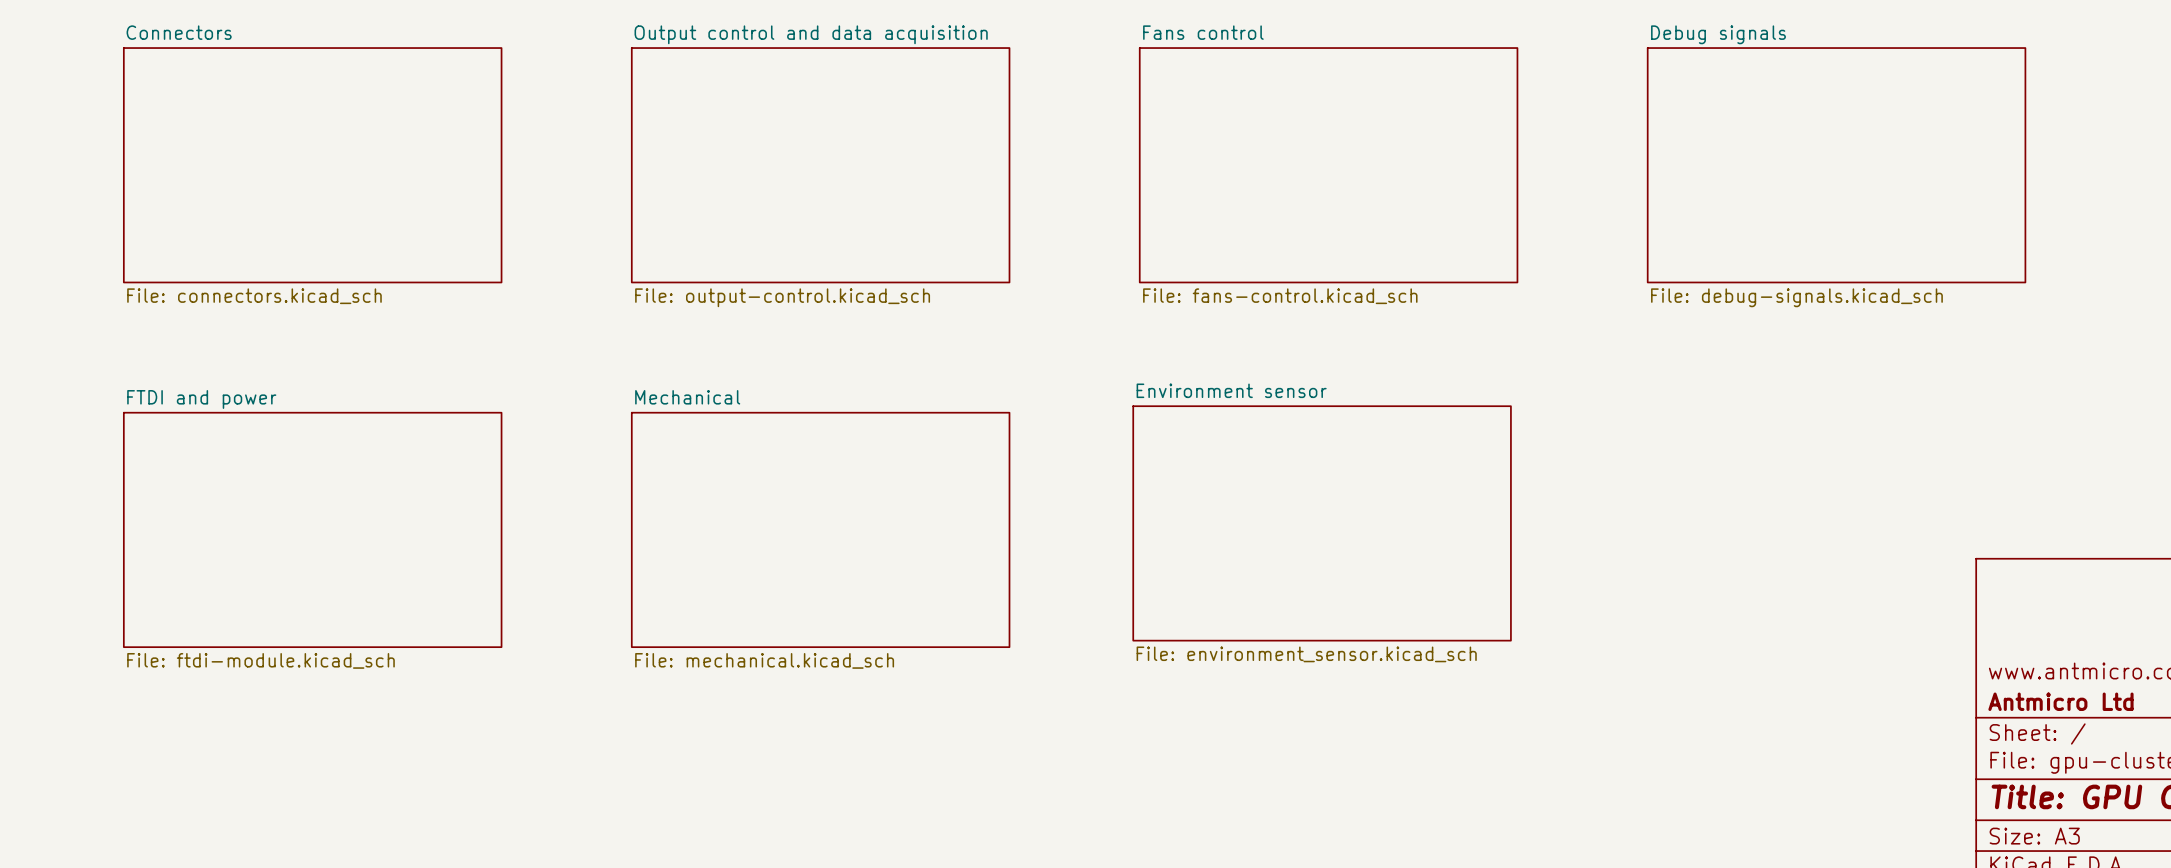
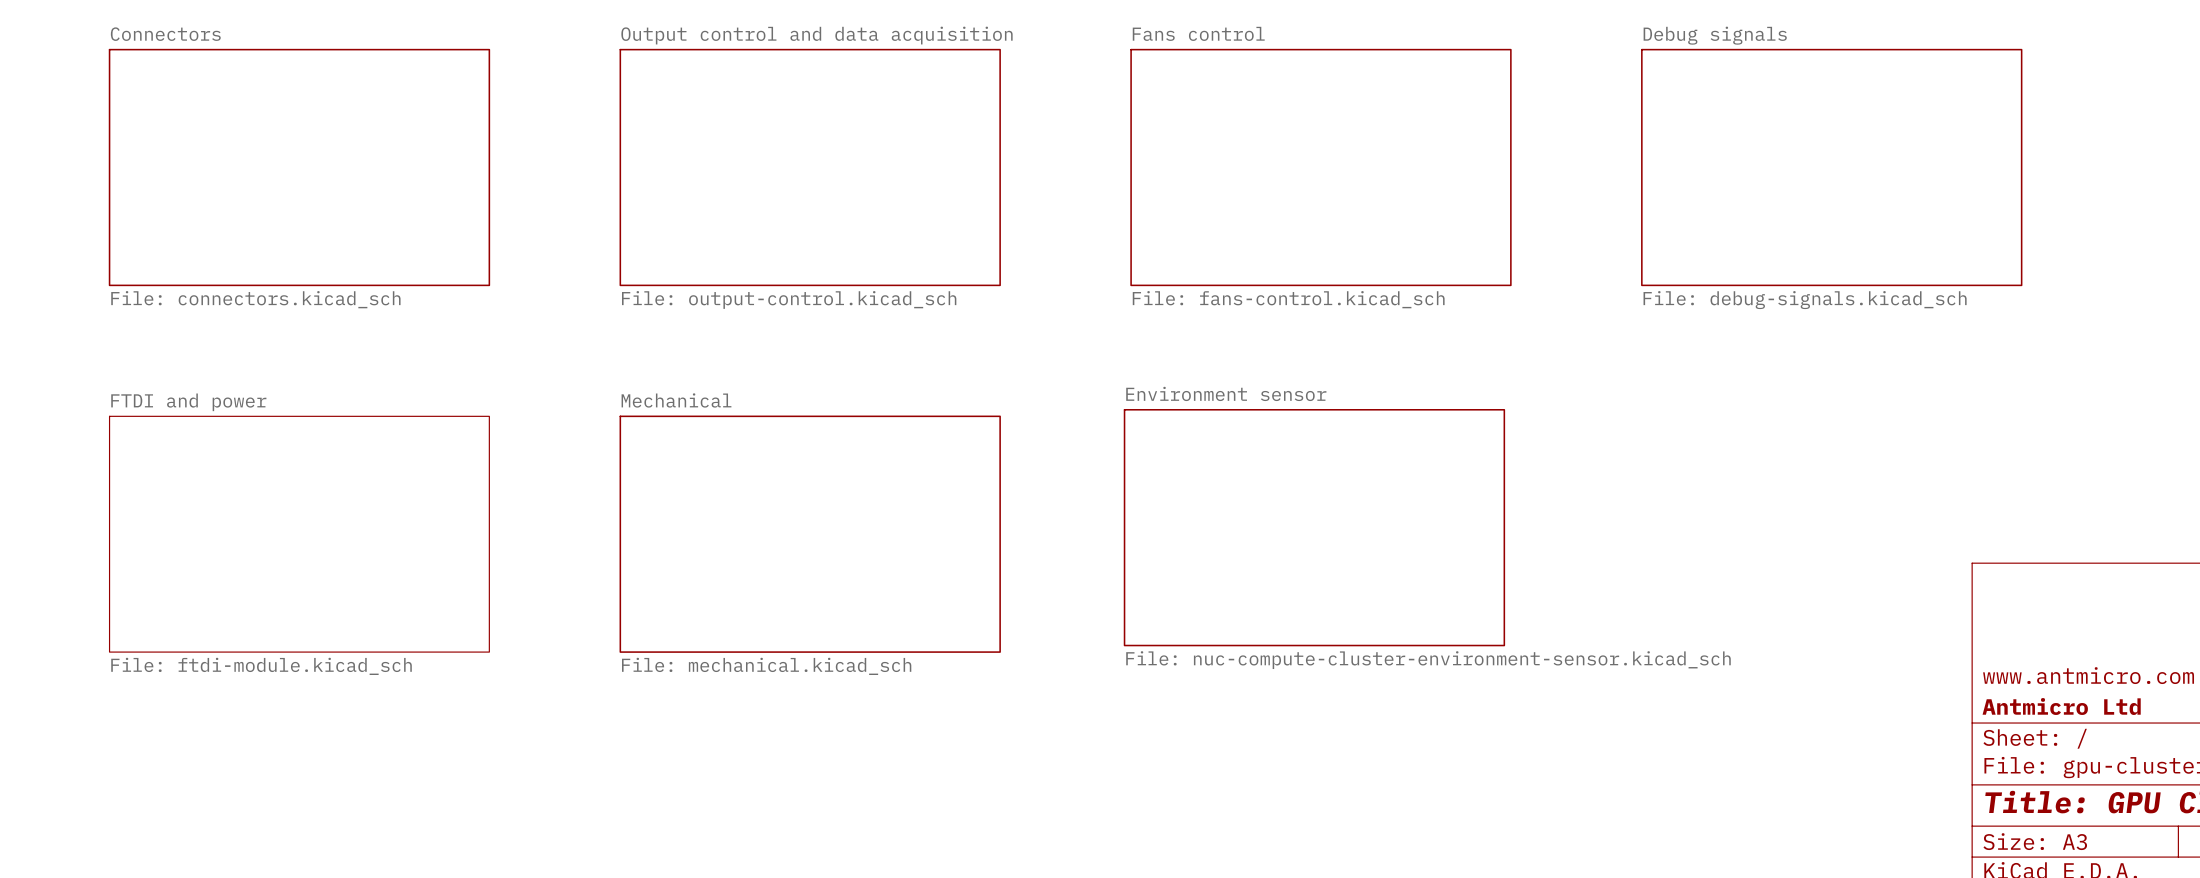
sheet Environment sensor value: File: environment_sensor.kicad_sch (1306, 654) -> File: nuc-compute-cluster-environment-sensor.kicad_sch (1428, 660)

